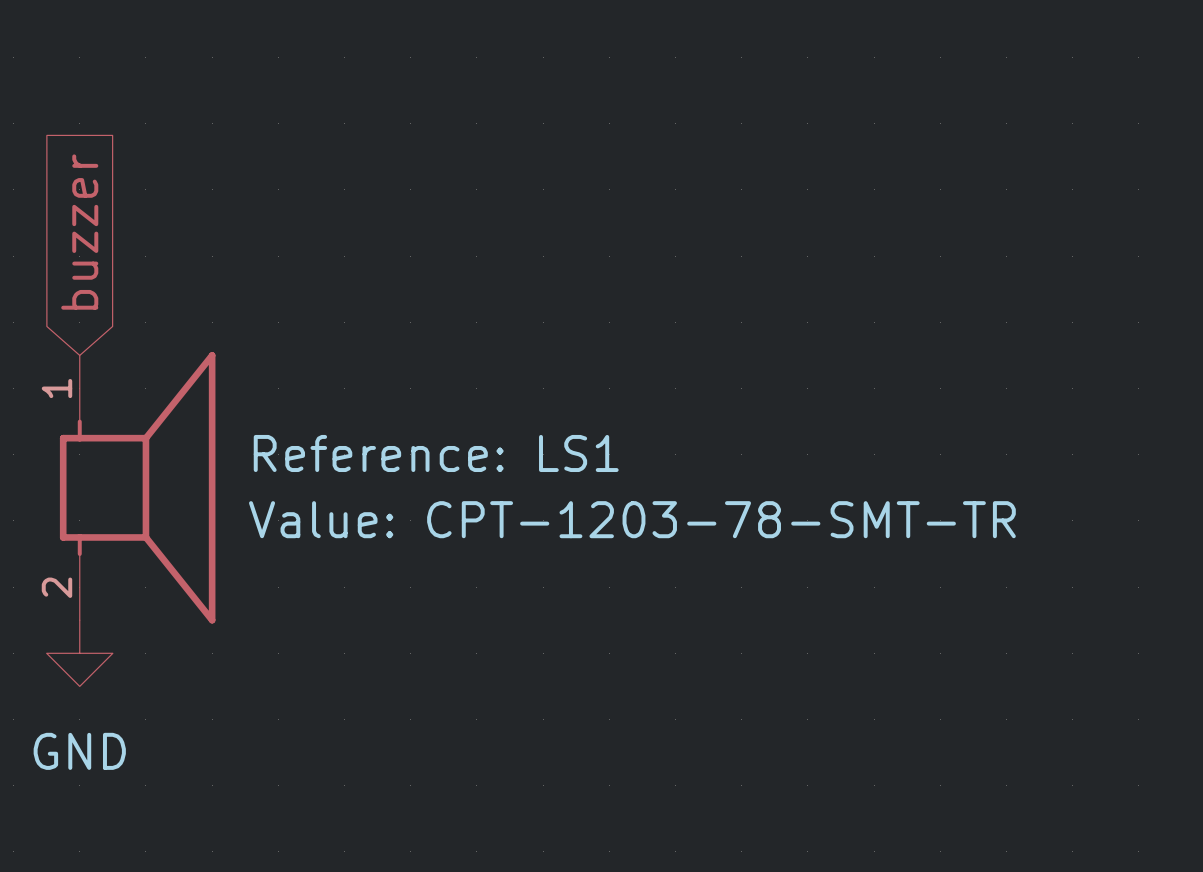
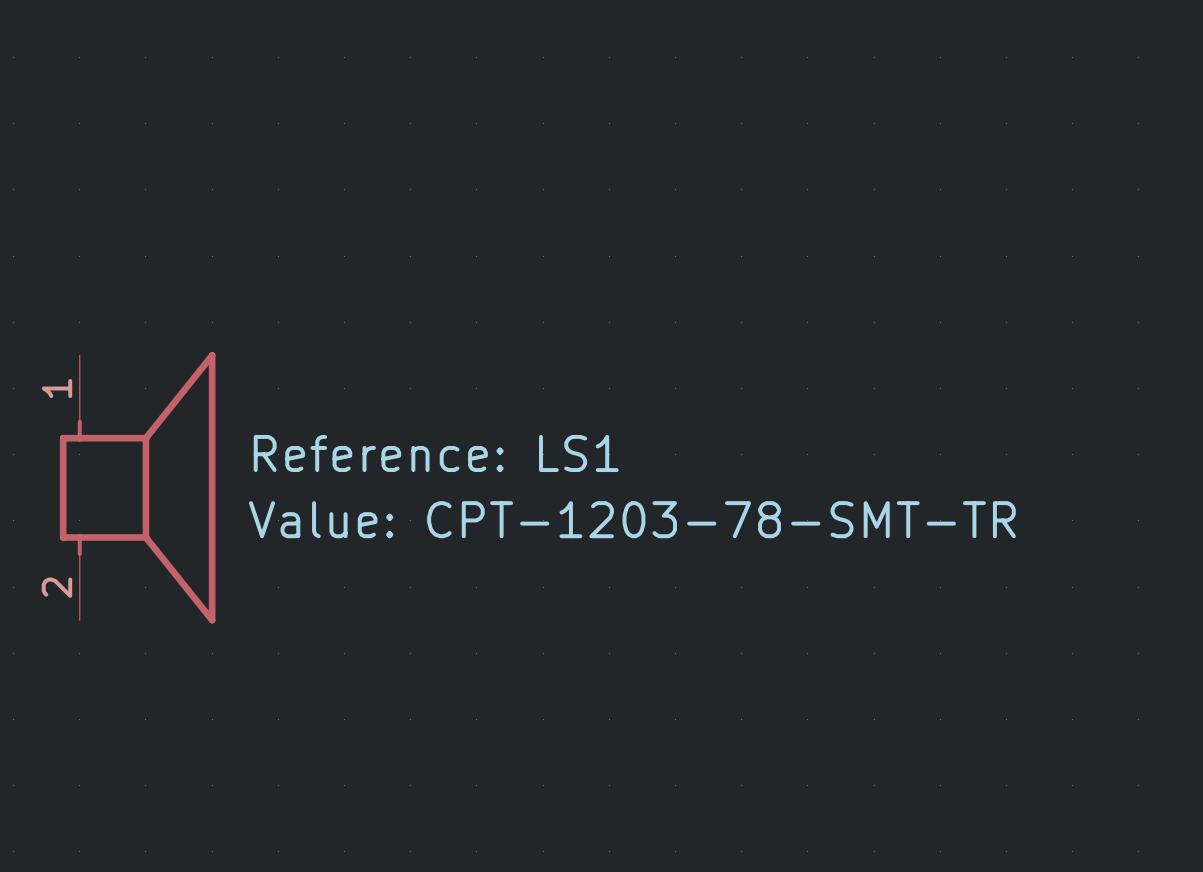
global label: buzzer (79, 232) -> none
power symbol: GND (79, 653) -> none

